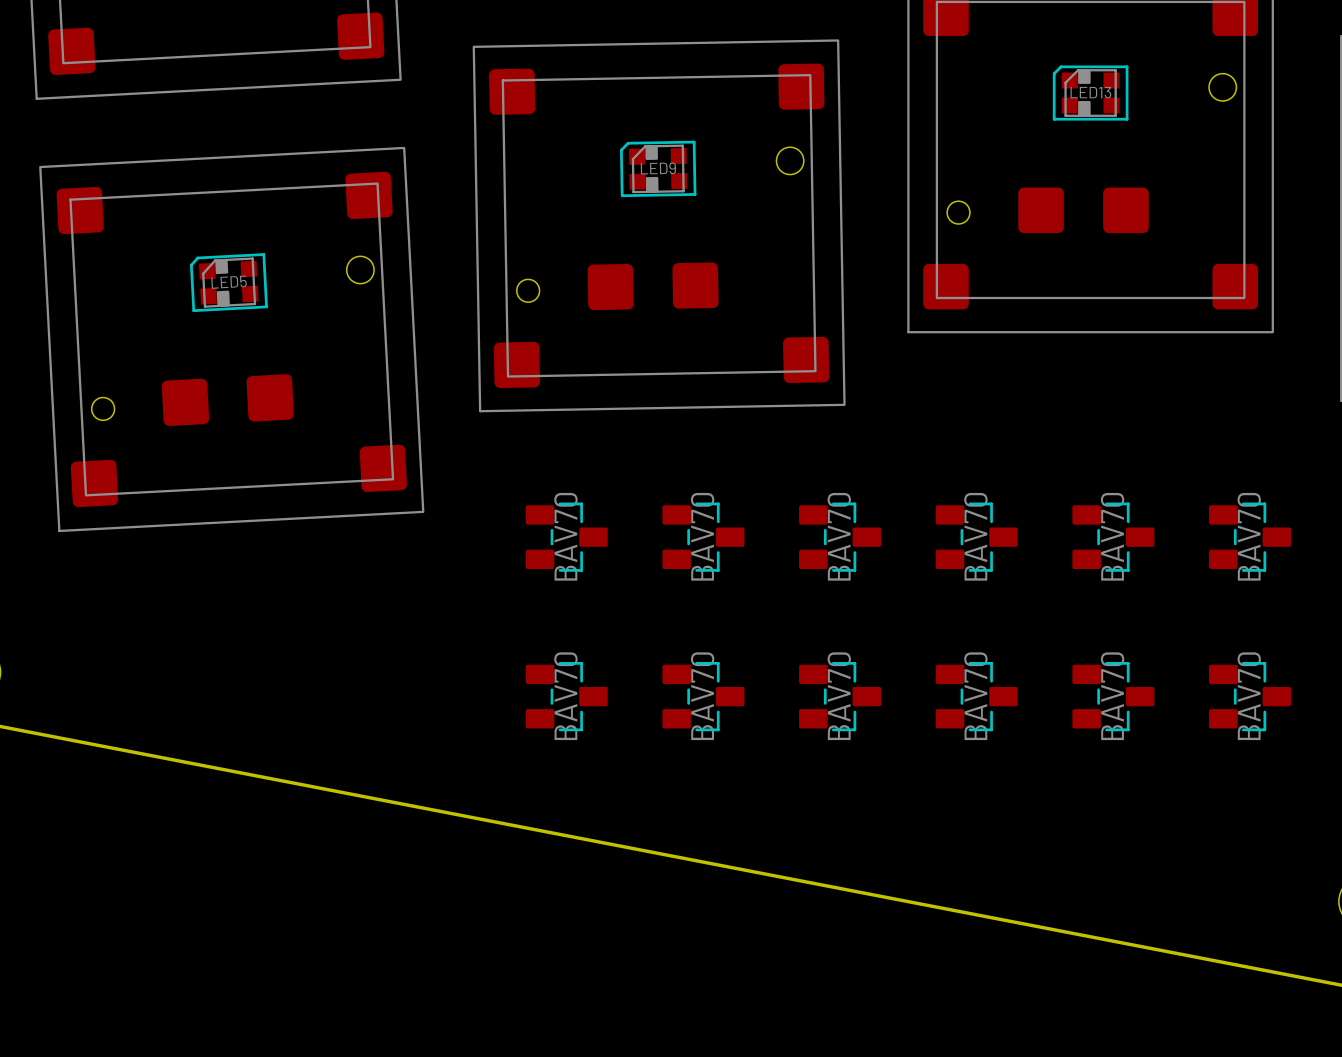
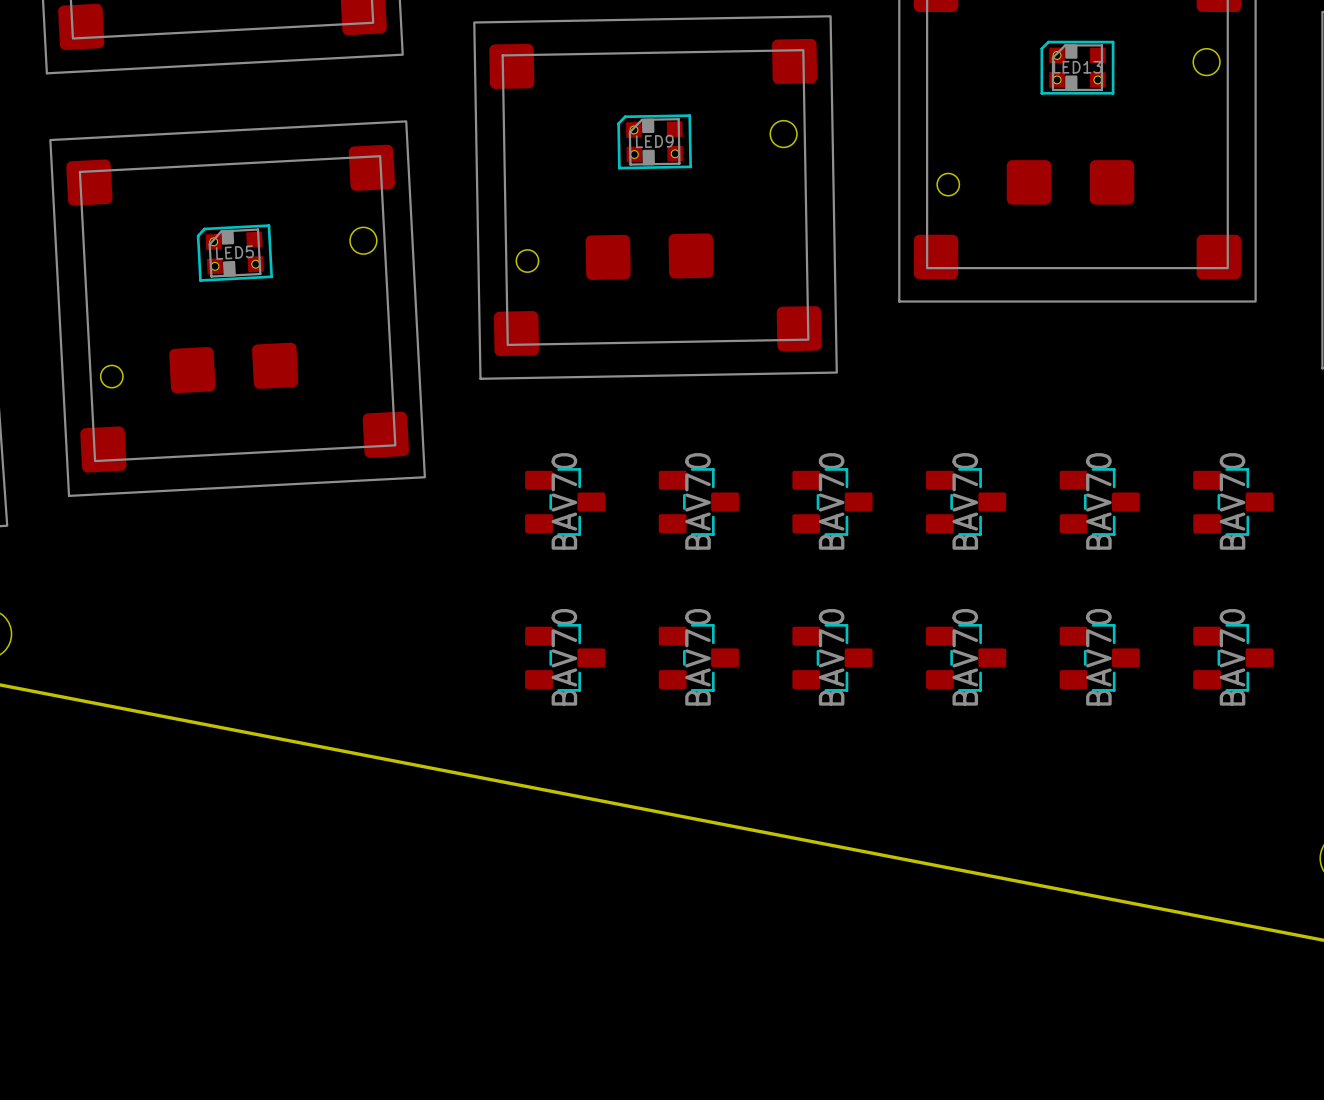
LED13 footprint: [1052, 65, 1129, 121] -> [1040, 40, 1115, 95]
LED9 footprint: [620, 140, 697, 198] -> [617, 114, 692, 170]
LED5 footprint: [190, 253, 268, 313] -> [196, 224, 273, 282]

